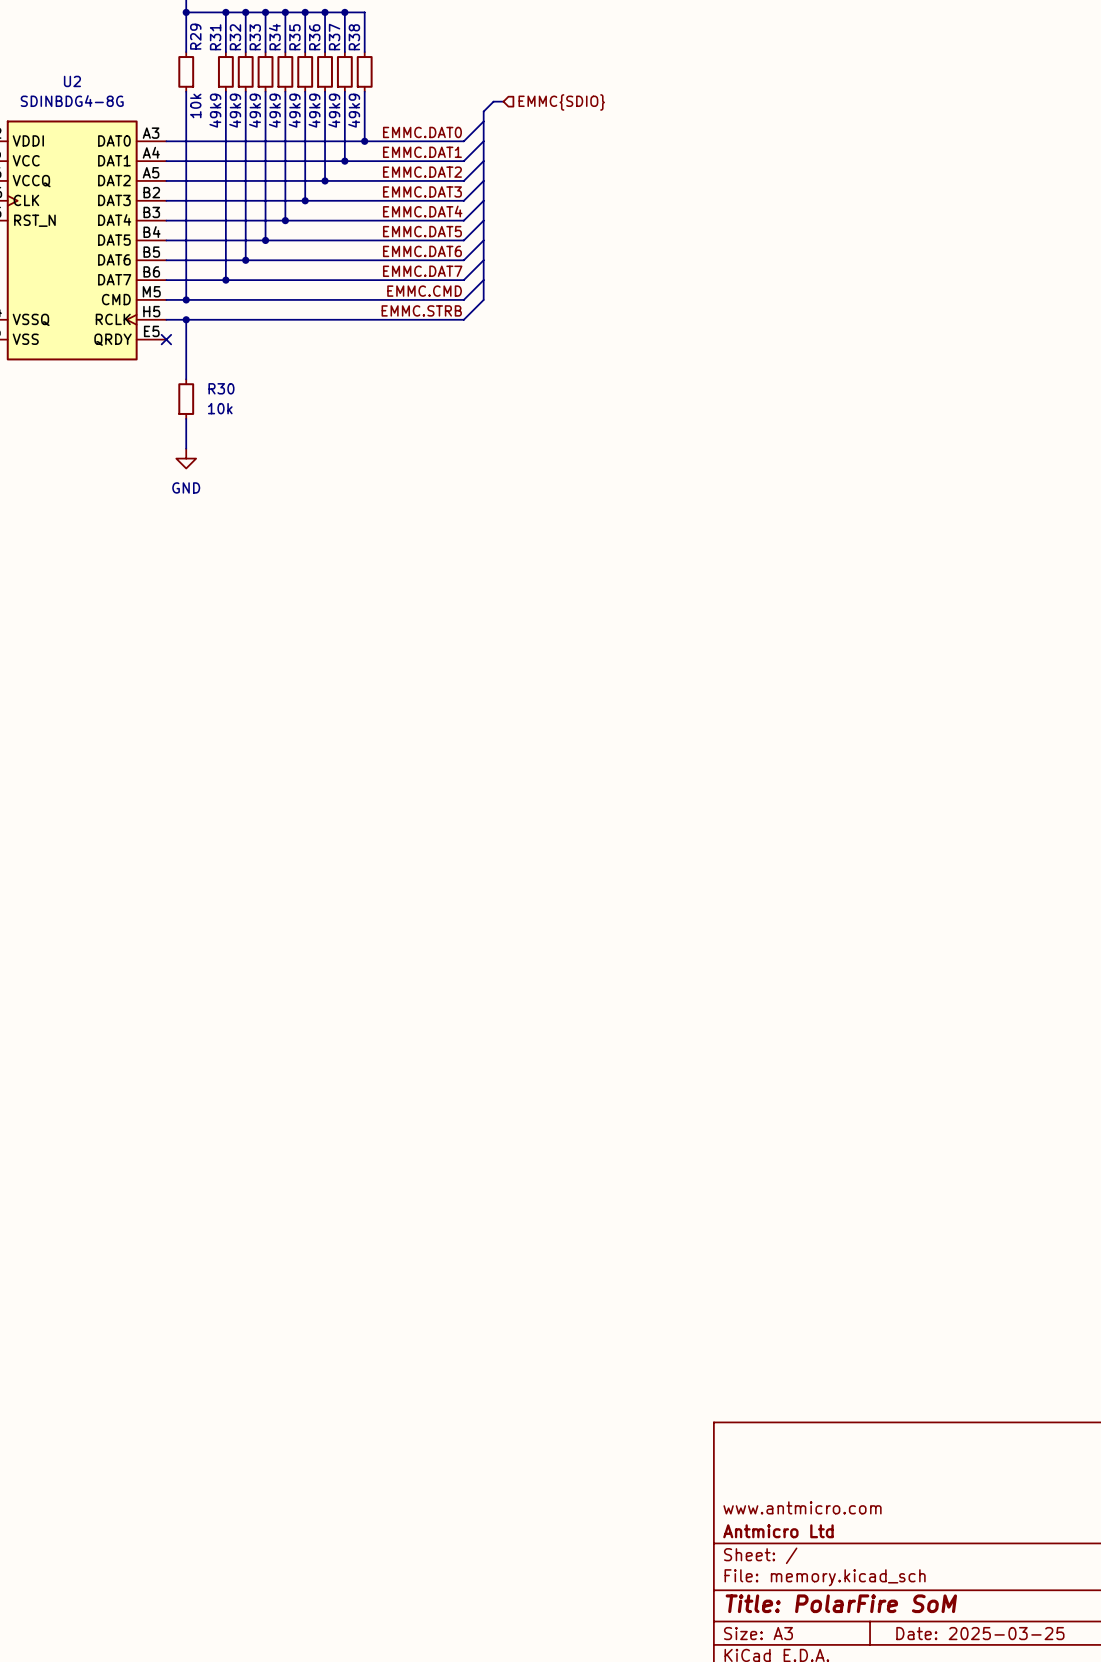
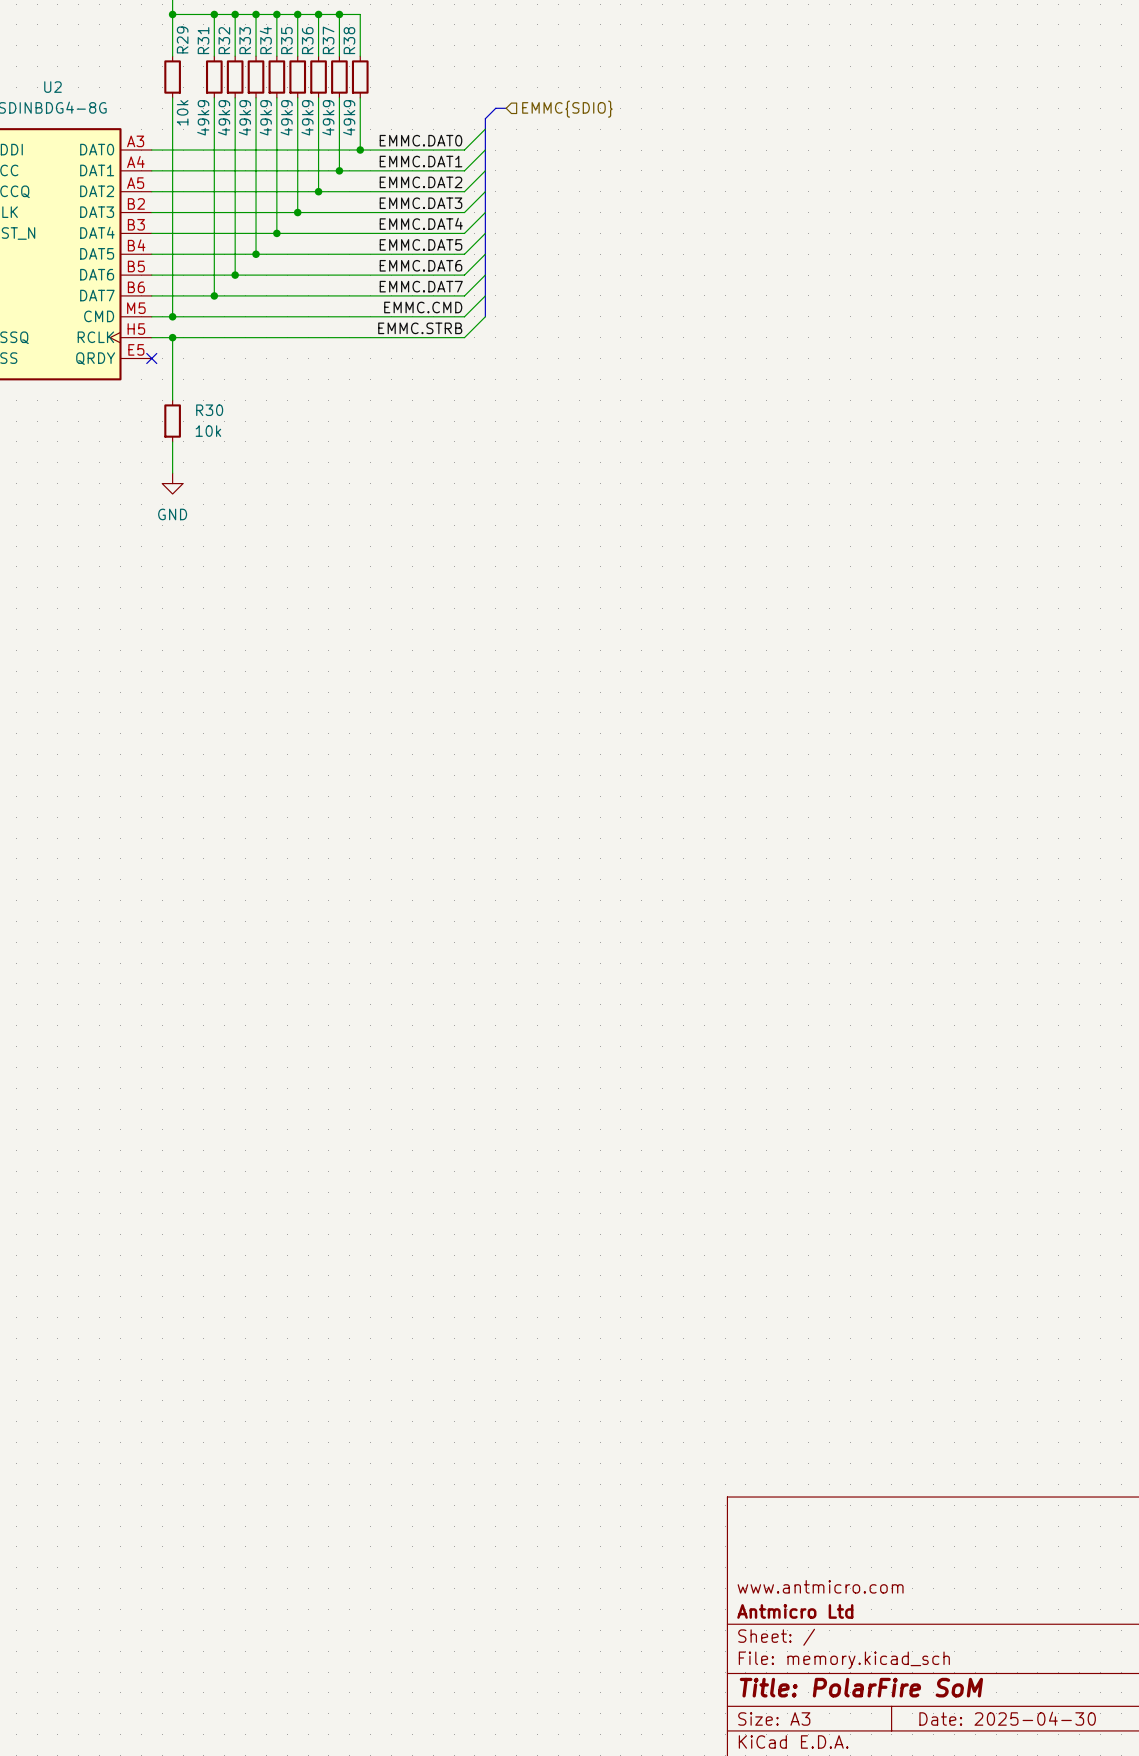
title block: Date: 2025-03-25 (980, 1633) -> Date: 2025-04-30 (1007, 1718)

